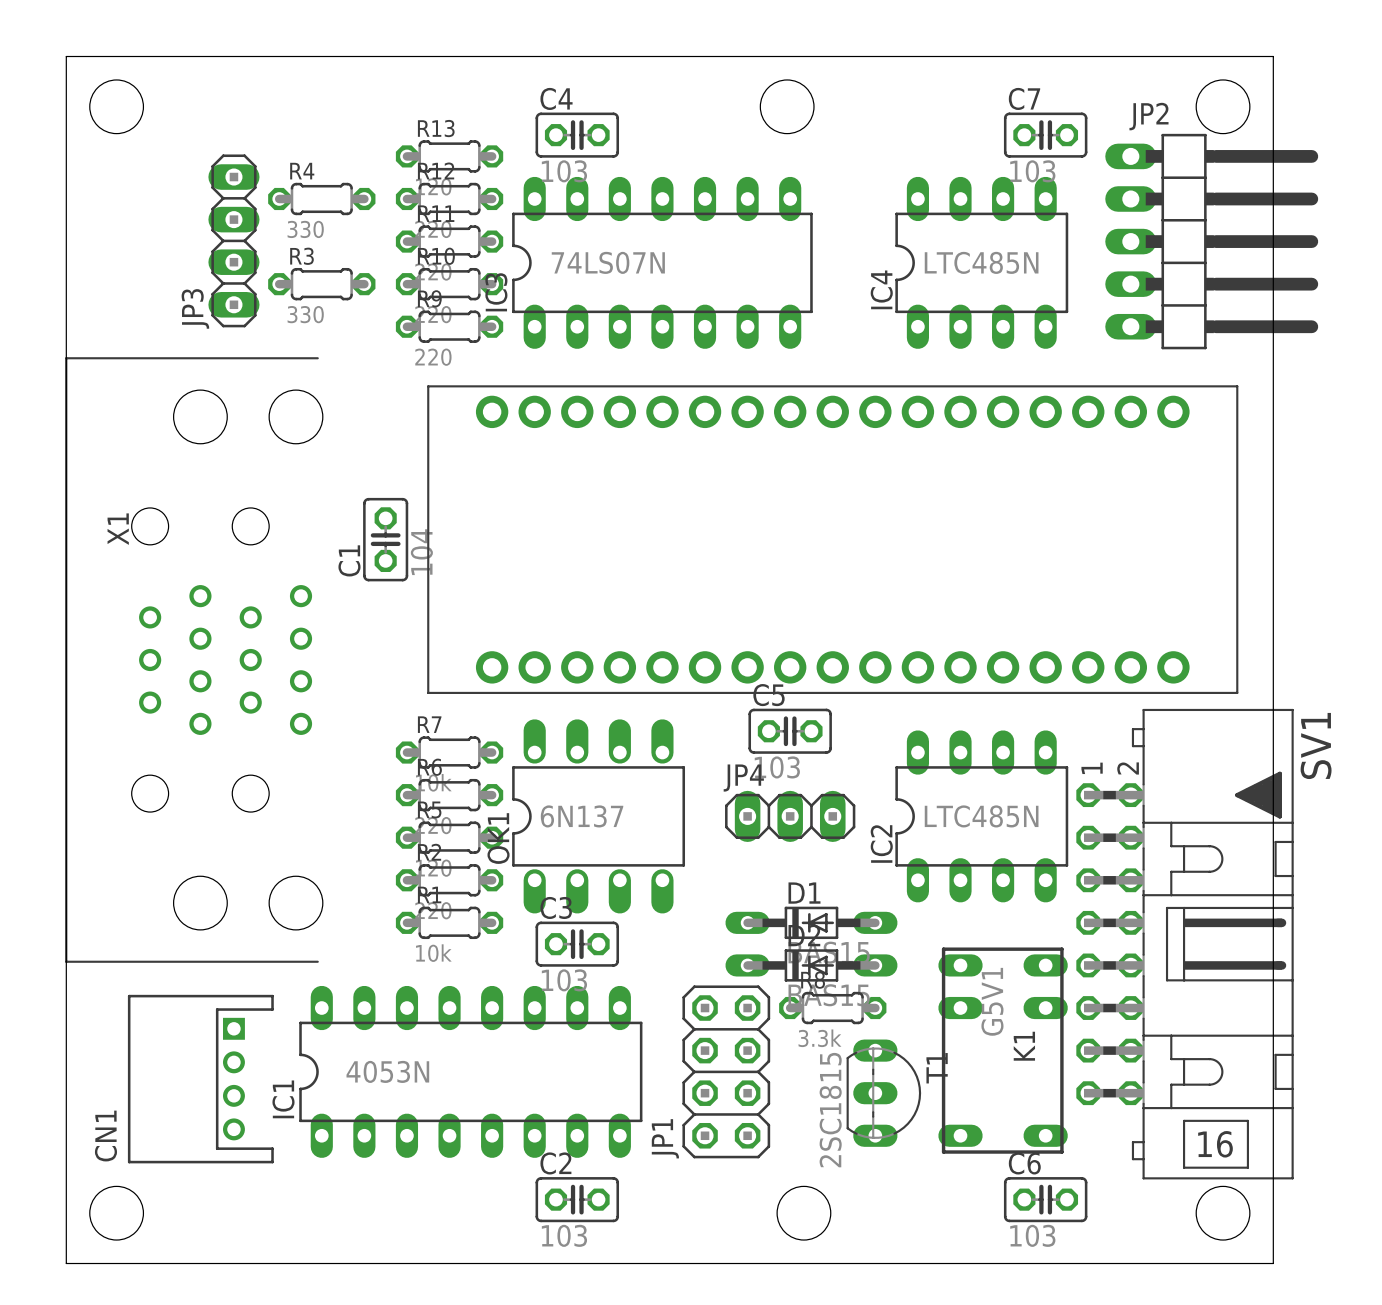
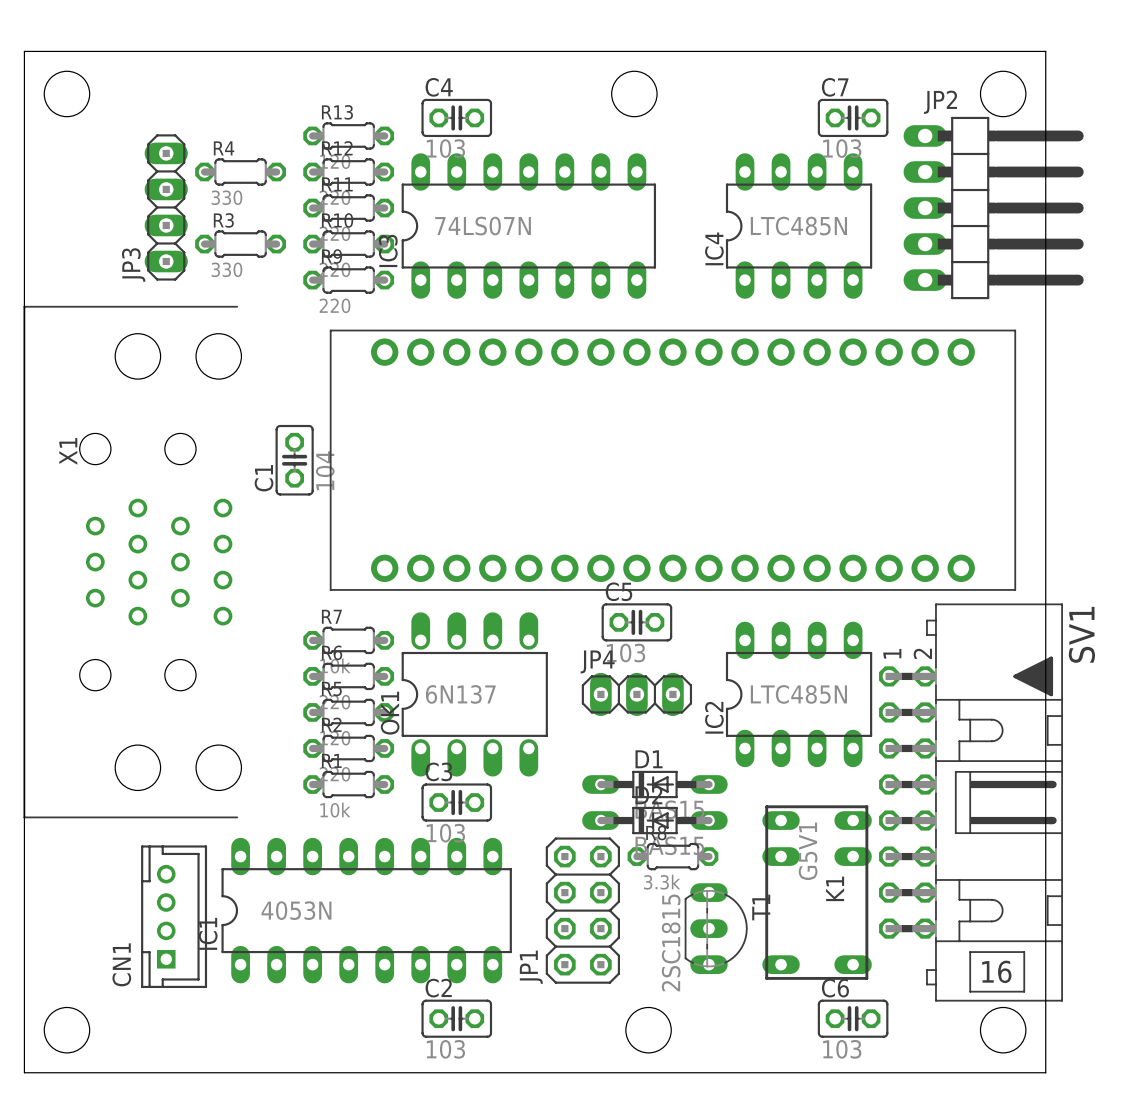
CN1 footprint: [127, 994, 274, 1164] -> [141, 845, 208, 989]

